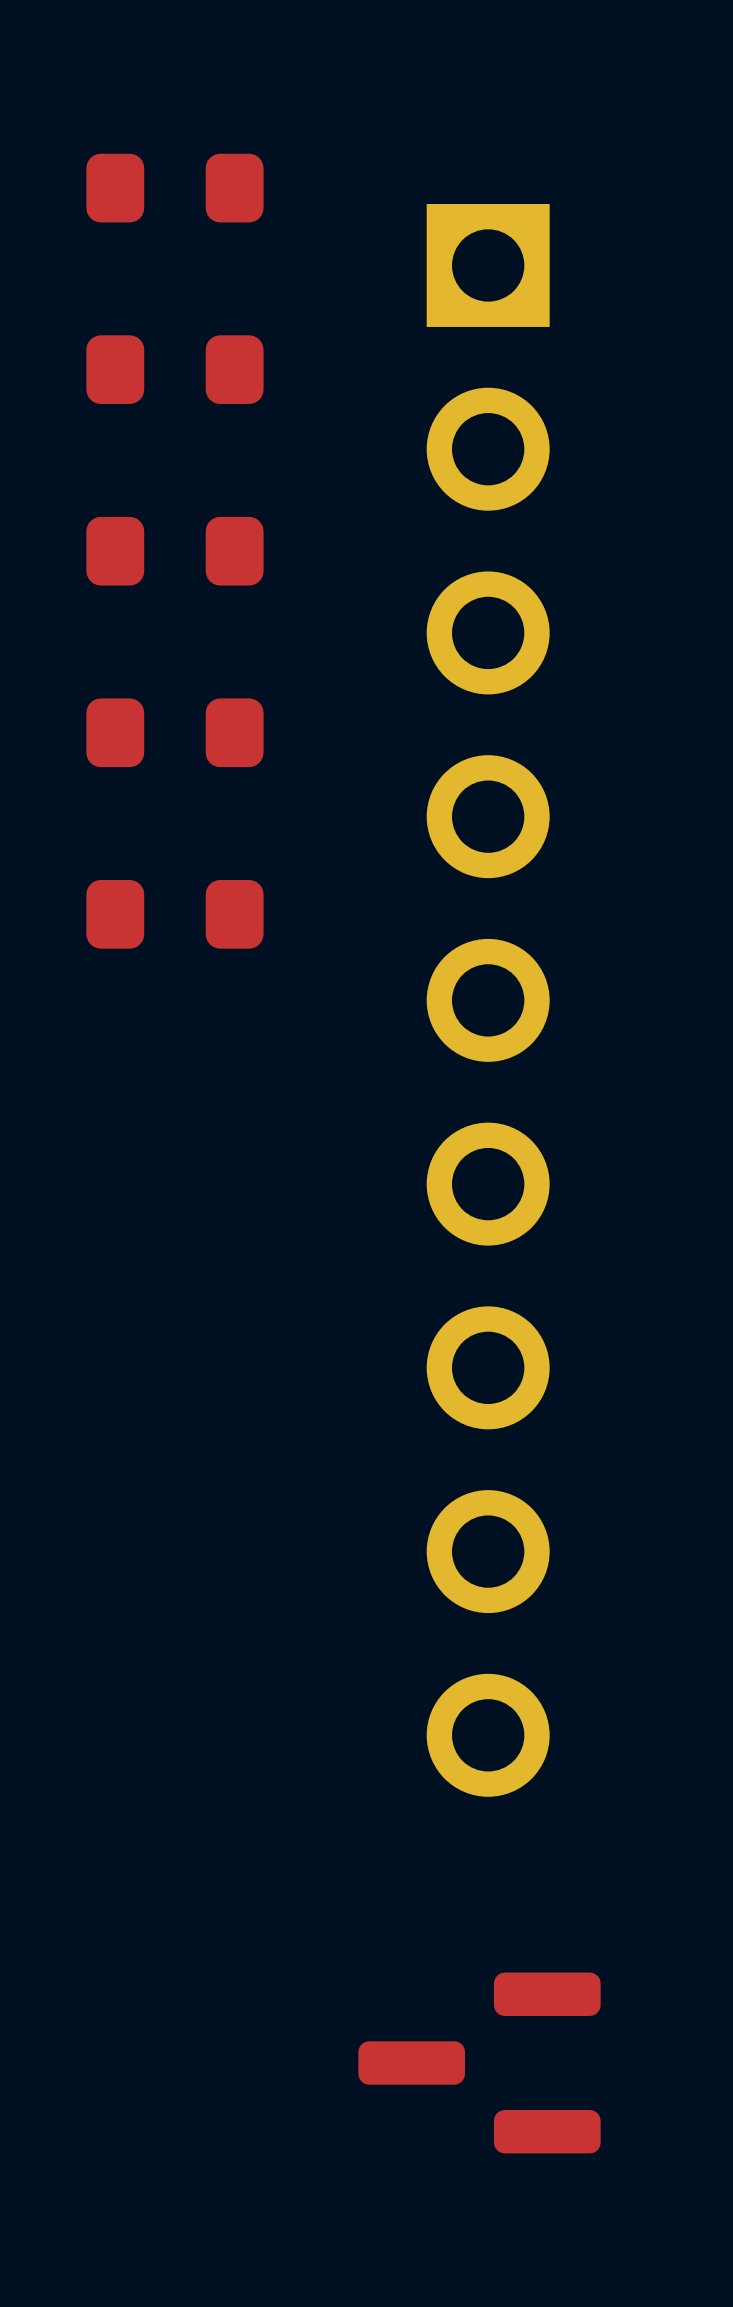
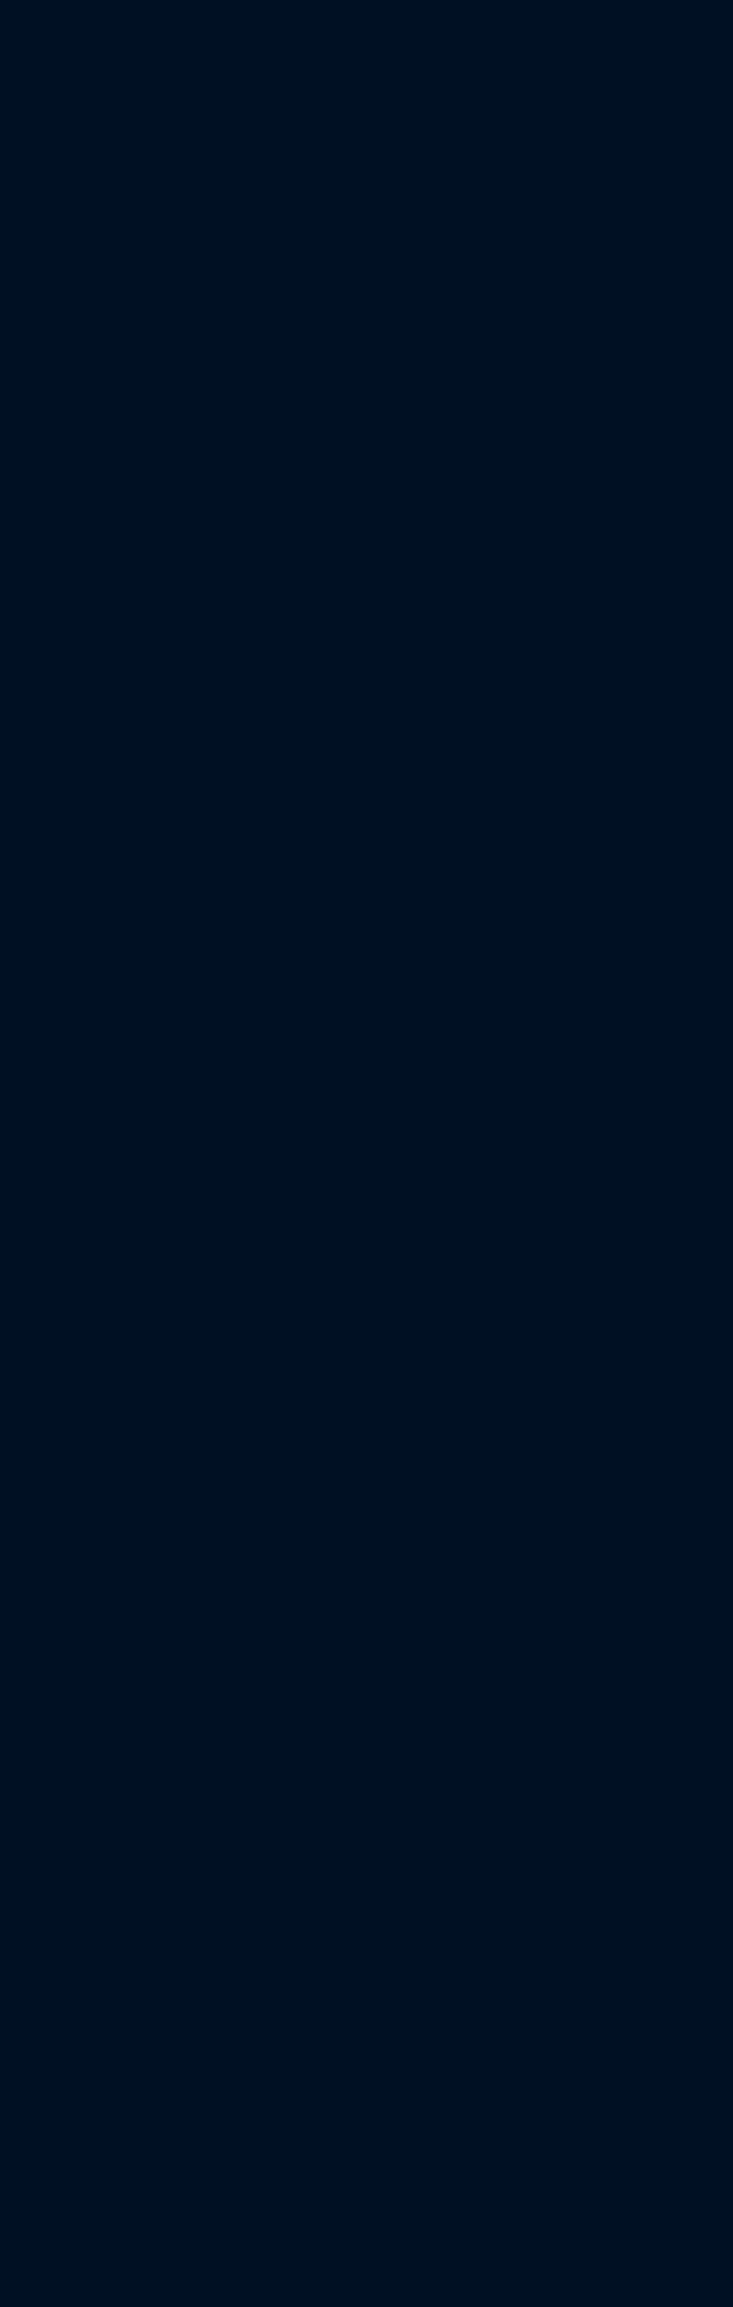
part: (174, 188) -> none
part: (174, 369) -> none
part: (174, 551) -> none
part: (174, 732) -> none
part: (174, 914) -> none
part: (488, 1000) -> none
part: (479, 2062) -> none

